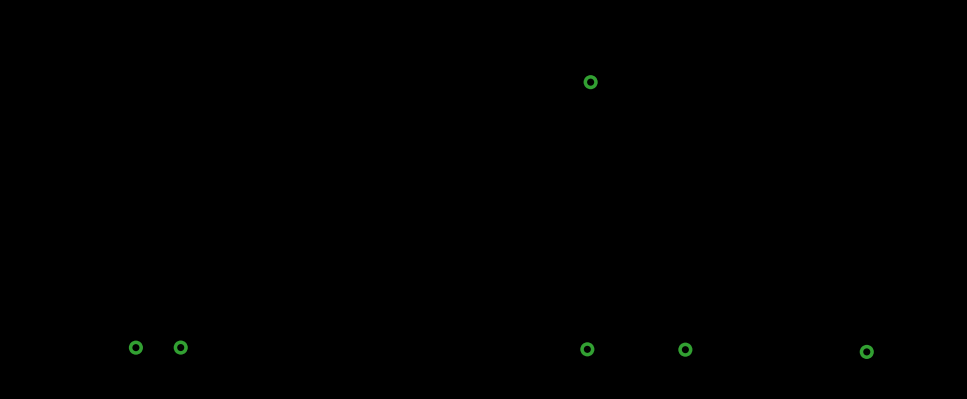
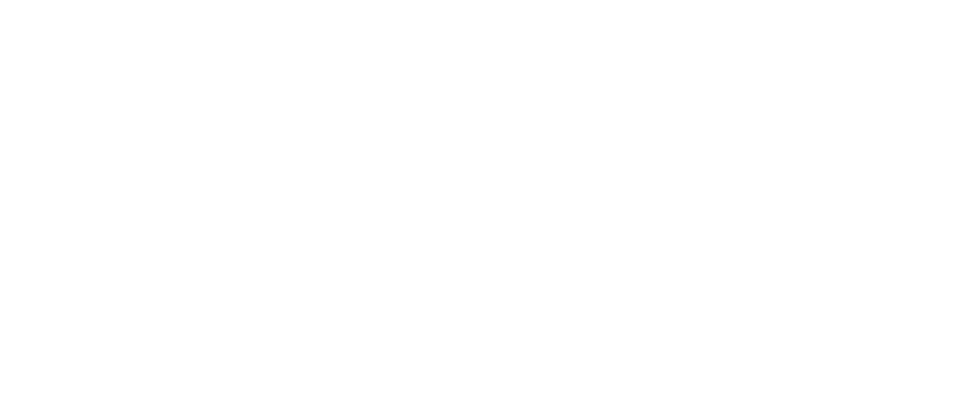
via: (590, 82) -> none
via: (135, 347) -> none
via: (180, 347) -> none
via: (587, 349) -> none
via: (685, 349) -> none
via: (866, 351) -> none

